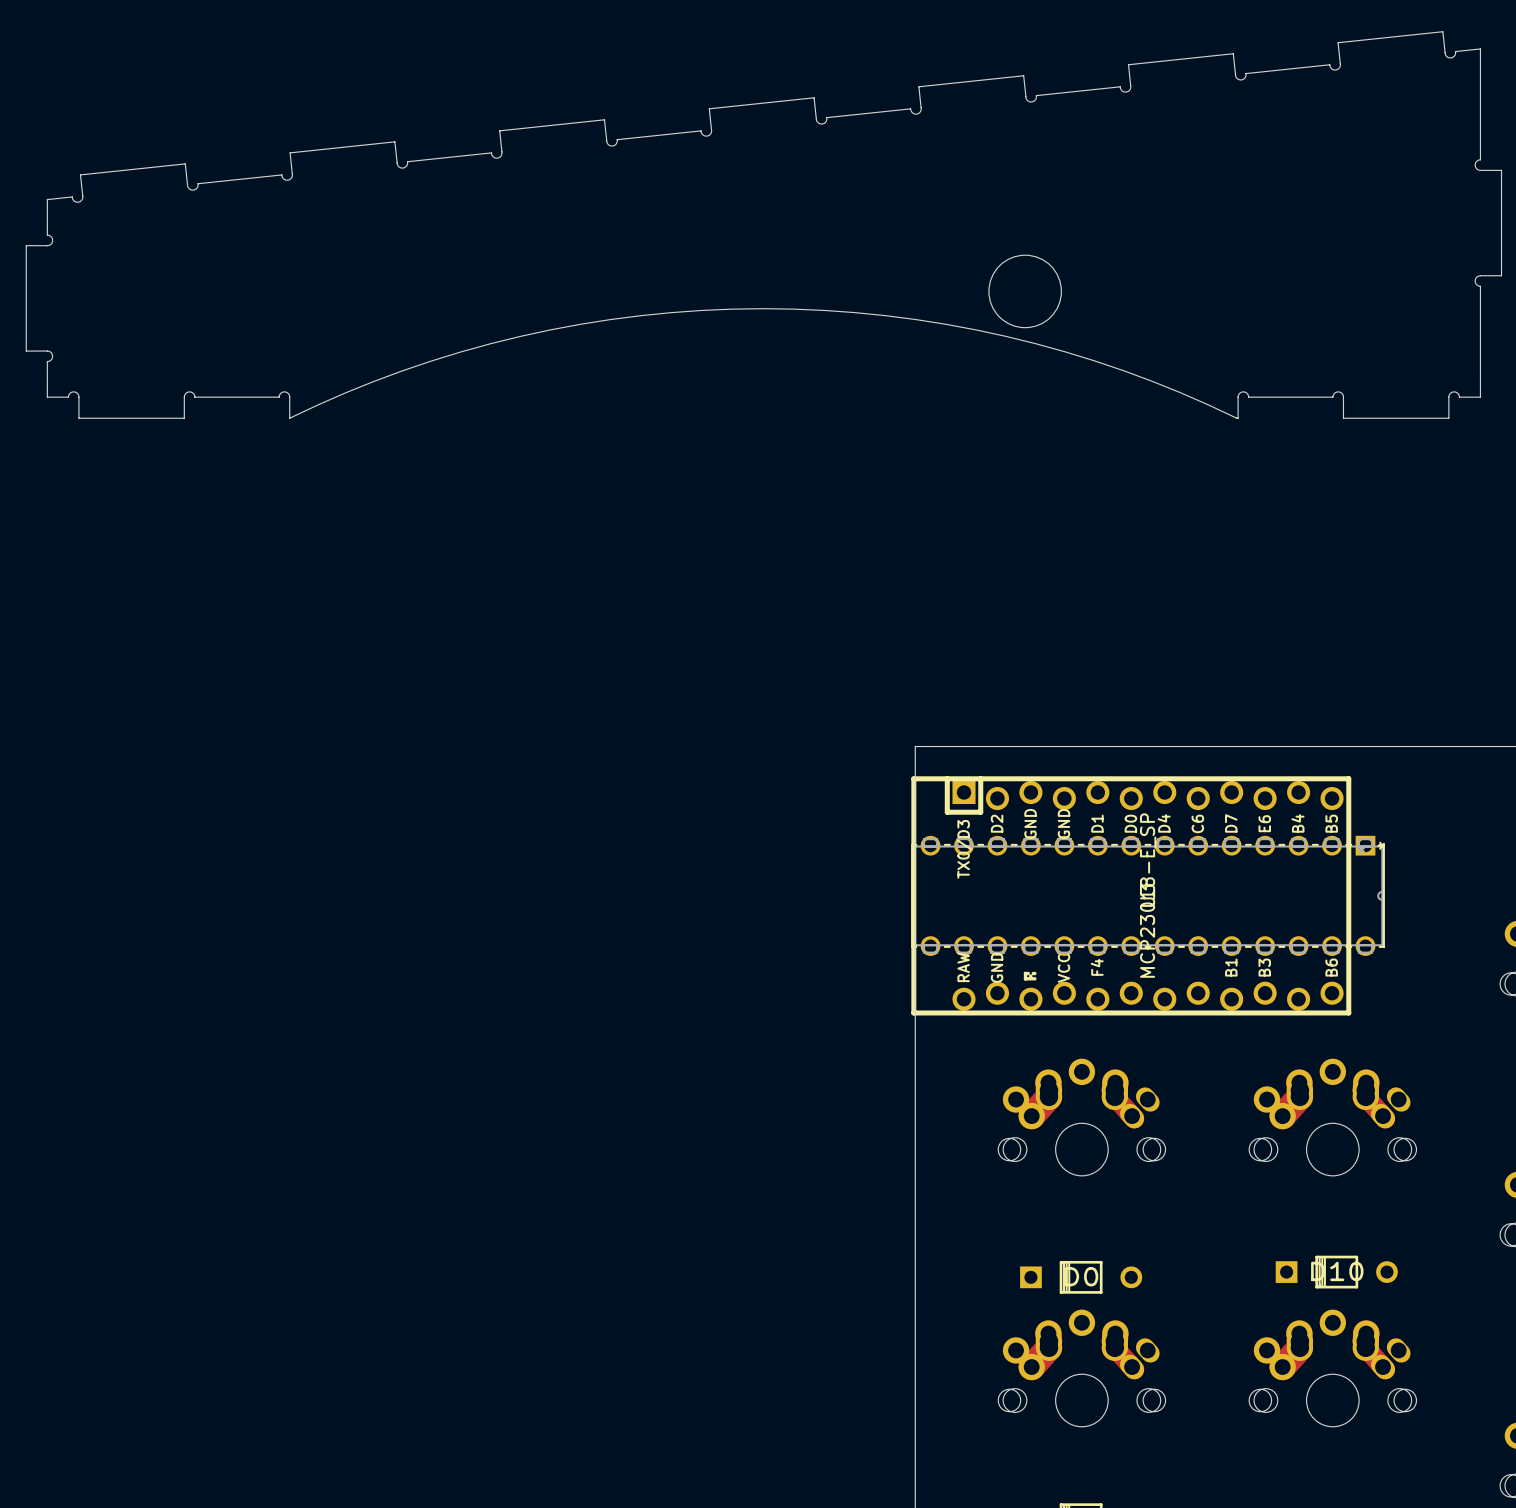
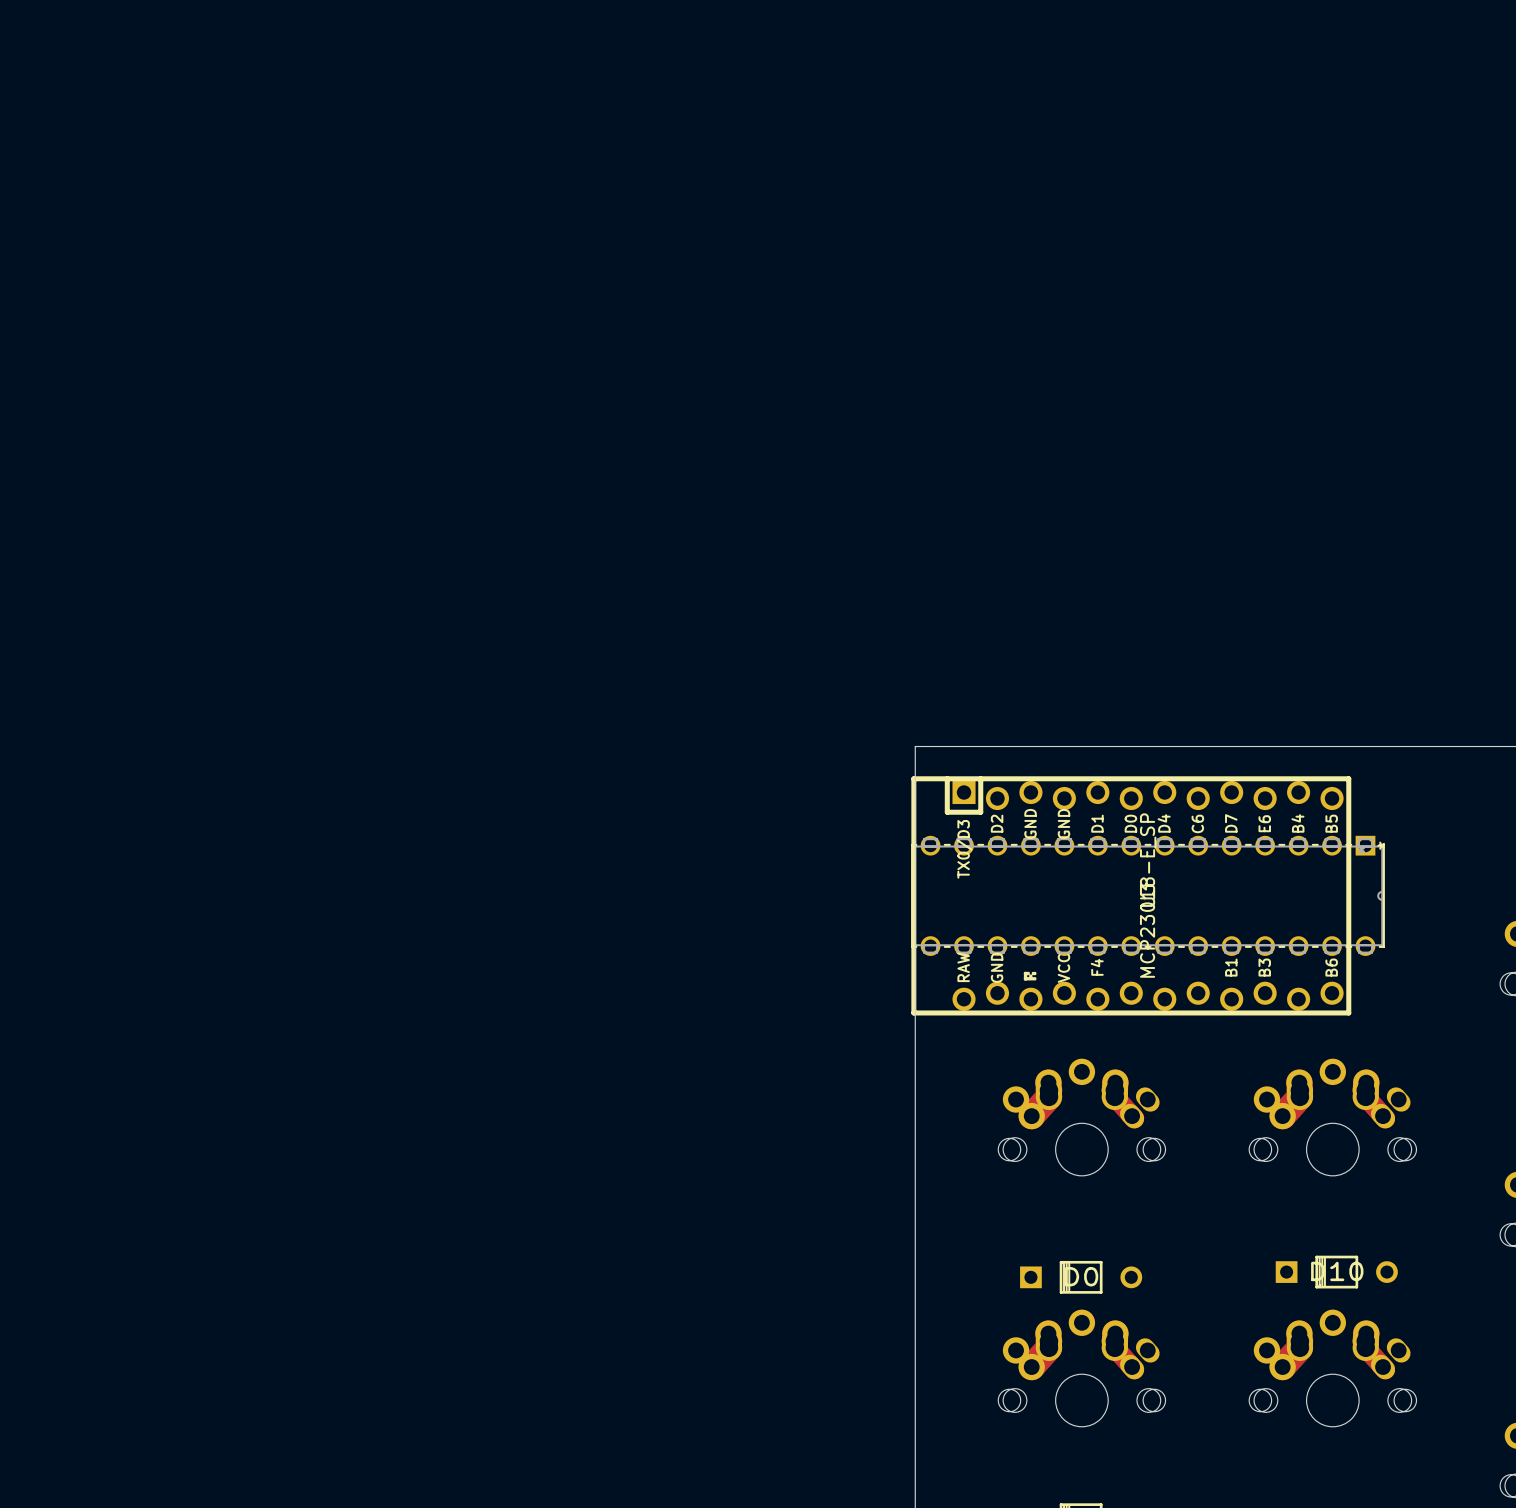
board edge: (292, 173) (290, 152) (394, 141) (397, 164) (401, 168) (406, 166) (407, 161) (491, 152) (493, 157) (497, 158) (502, 153) (499, 130) (604, 119) (606, 142) (611, 145) (615, 144) (617, 139) (701, 130) (703, 135) (706, 136) (711, 131) (709, 108) (814, 97) (816, 120) (820, 123) (825, 122) (826, 117) (910, 108) (912, 112) (916, 114) (921, 109) (918, 86) (1023, 75) (1026, 98) (1030, 101) (1034, 100) (1036, 95) (1120, 86) (1122, 90) (1126, 92) (1130, 87) (1128, 64) (1233, 53) (1235, 76) (1239, 79) (1244, 78) (1245, 73) (1329, 64) (1331, 68) (1335, 70) (1340, 65) (1338, 42) (1442, 31) (1445, 54) (1448, 57) (1453, 56) (1455, 51) (1480, 48) (1480, 159) (1476, 161) (1475, 165) (1479, 170) (1501, 170) (1501, 275) (1479, 275) (1475, 278) (1476, 284) (1480, 286) (1480, 397) (1459, 397) (1456, 392) (1451, 392) (1448, 396) (1448, 418) (1343, 418) (1343, 395) (1338, 391) (1334, 393) (1332, 397) (1248, 397) (1246, 392) (1242, 392) (1238, 395) (1238, 418) (1236, 418) (1152, 381) (1094, 360) (1035, 343) (976, 329) (915, 319) (854, 312) (793, 309) (732, 309) (671, 312) (610, 319) (550, 329) (490, 343) (402, 370) (345, 392) (289, 418) (289, 396) (285, 391) (280, 393) (279, 397) (194, 397) (192, 392) (188, 392) (184, 396) (184, 418) (78, 418) (78, 396) (76, 392) (71, 392) (68, 397) (47, 397) (47, 361) (51, 358) (52, 354) (48, 351) (26, 351) (26, 245) (48, 245) (52, 242) (51, 237) (47, 235) (47, 199) (72, 196) (74, 201) (80, 201) (82, 197) (80, 174) (185, 163) (187, 186) (191, 190) (196, 188) (197, 183) (281, 174) (283, 178) (287, 180) (291, 177) (292, 173) -> none
round board edge: [988, 254, 1062, 329] -> none

